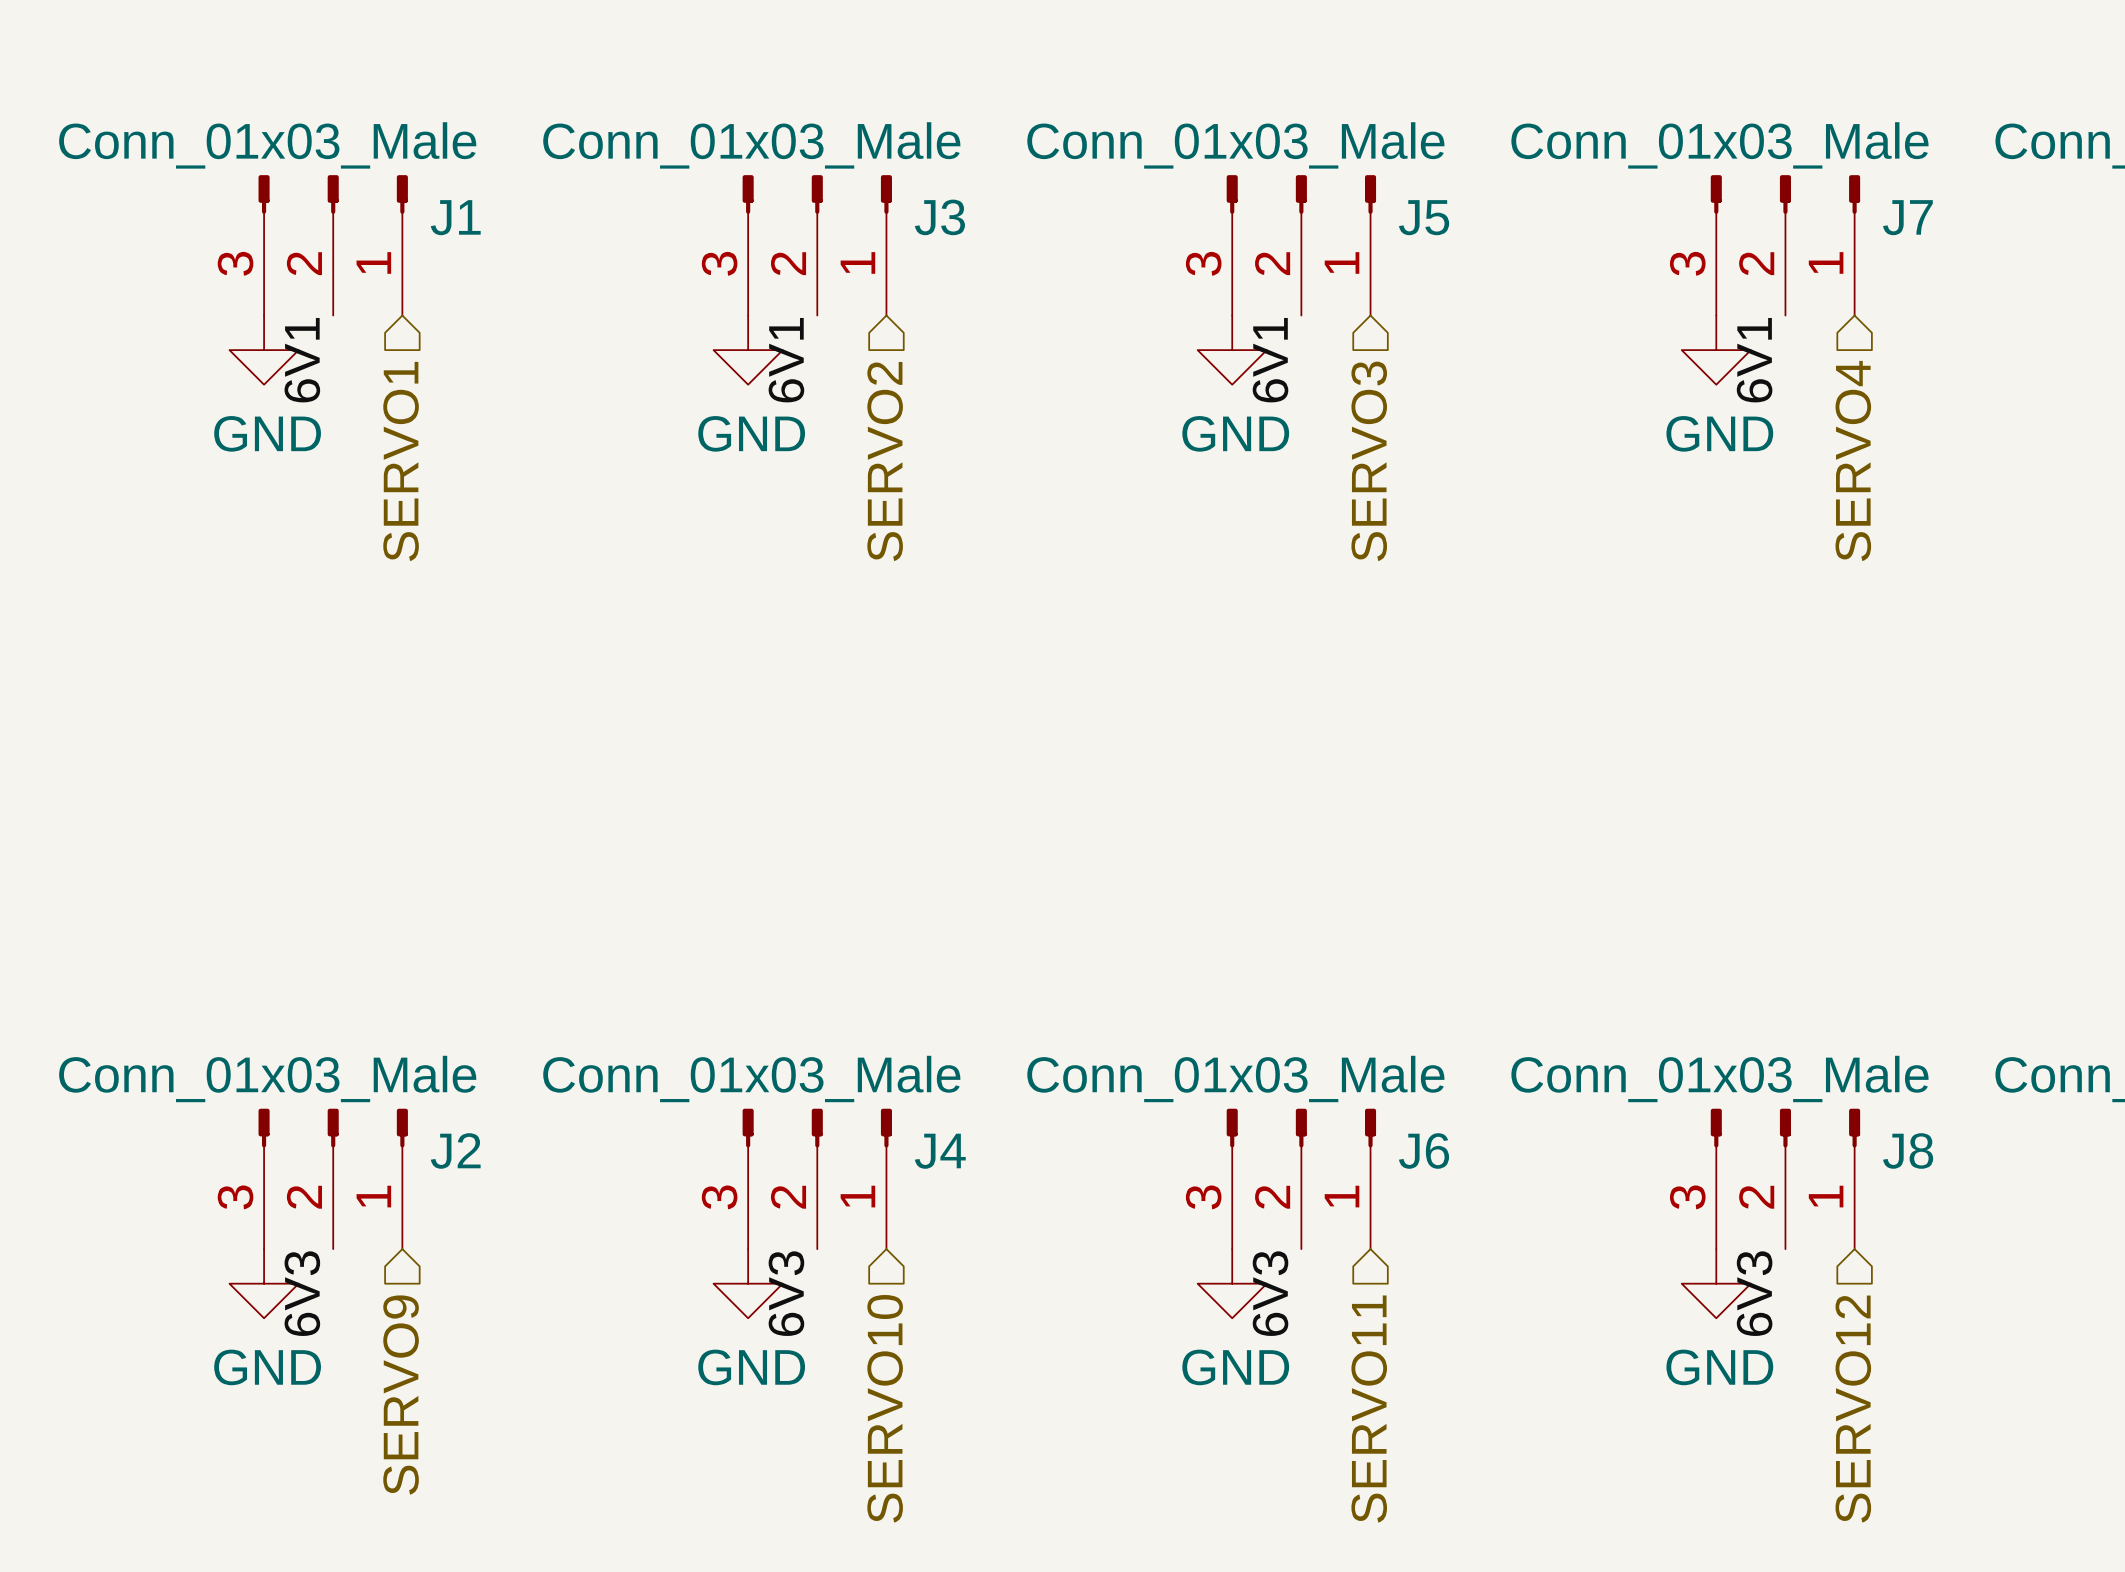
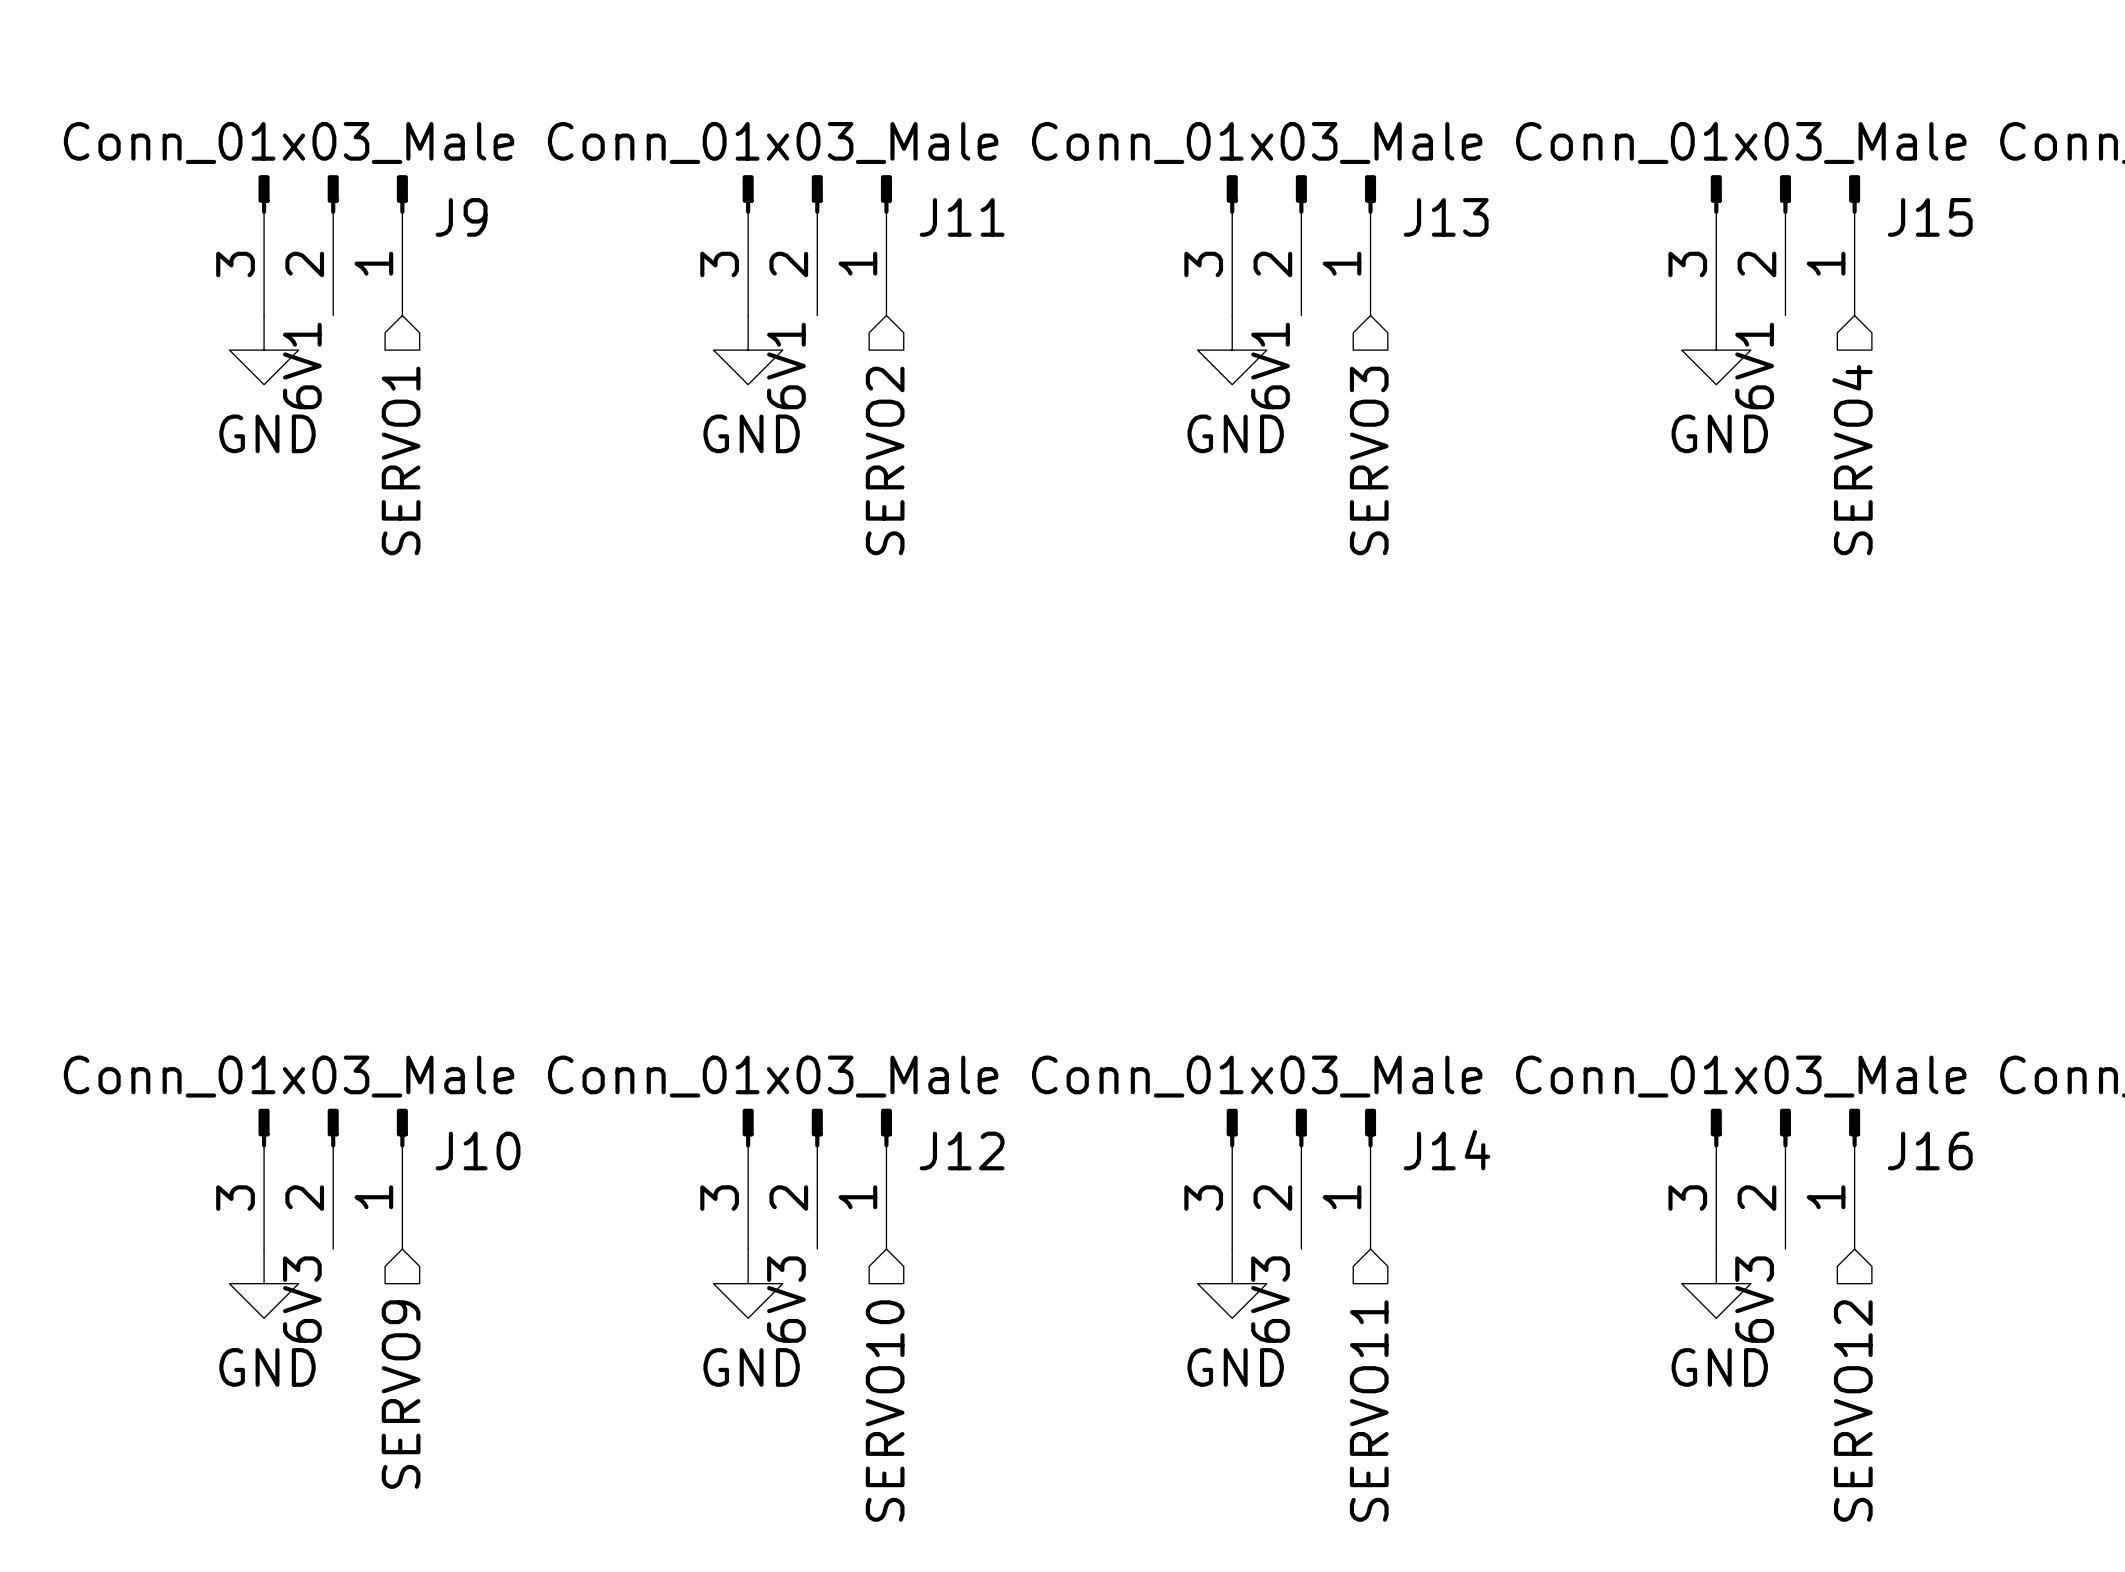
J1 name: J1 (455, 217) -> J9 (461, 217)
J3 name: J3 (939, 217) -> J11 (962, 217)
J5 name: J5 (1424, 217) -> J13 (1446, 217)
J7 name: J7 (1907, 217) -> J15 (1930, 217)
J2 name: J2 (455, 1150) -> J10 (478, 1151)
J6 name: J6 (1424, 1150) -> J14 (1447, 1150)
J8 name: J8 (1908, 1150) -> J16 (1930, 1151)
J4 name: J4 (940, 1151) -> J12 (962, 1151)

